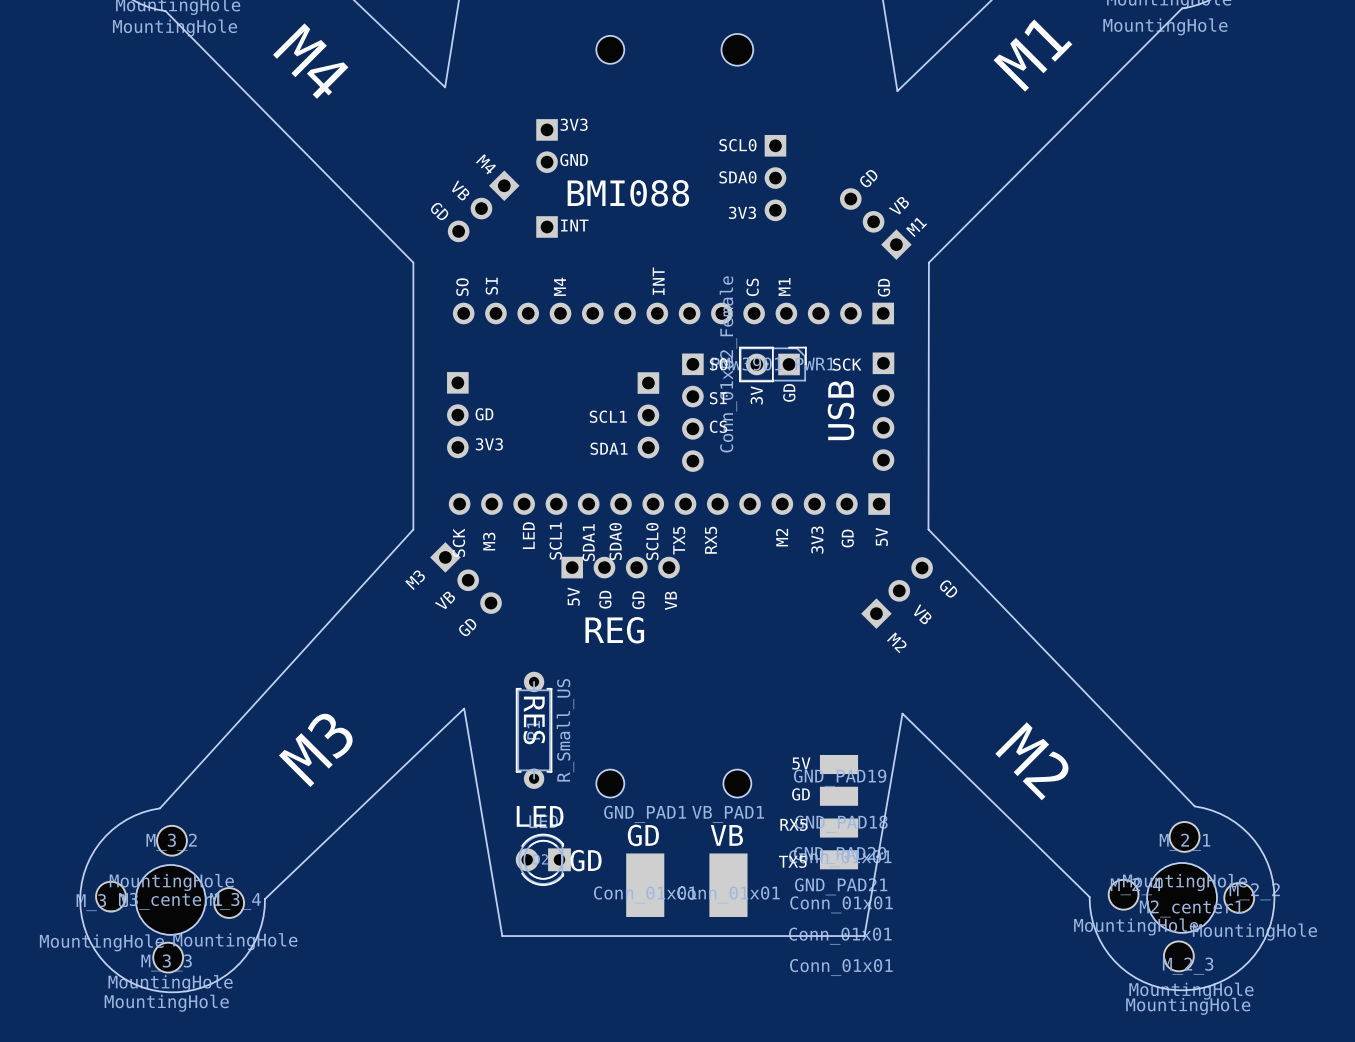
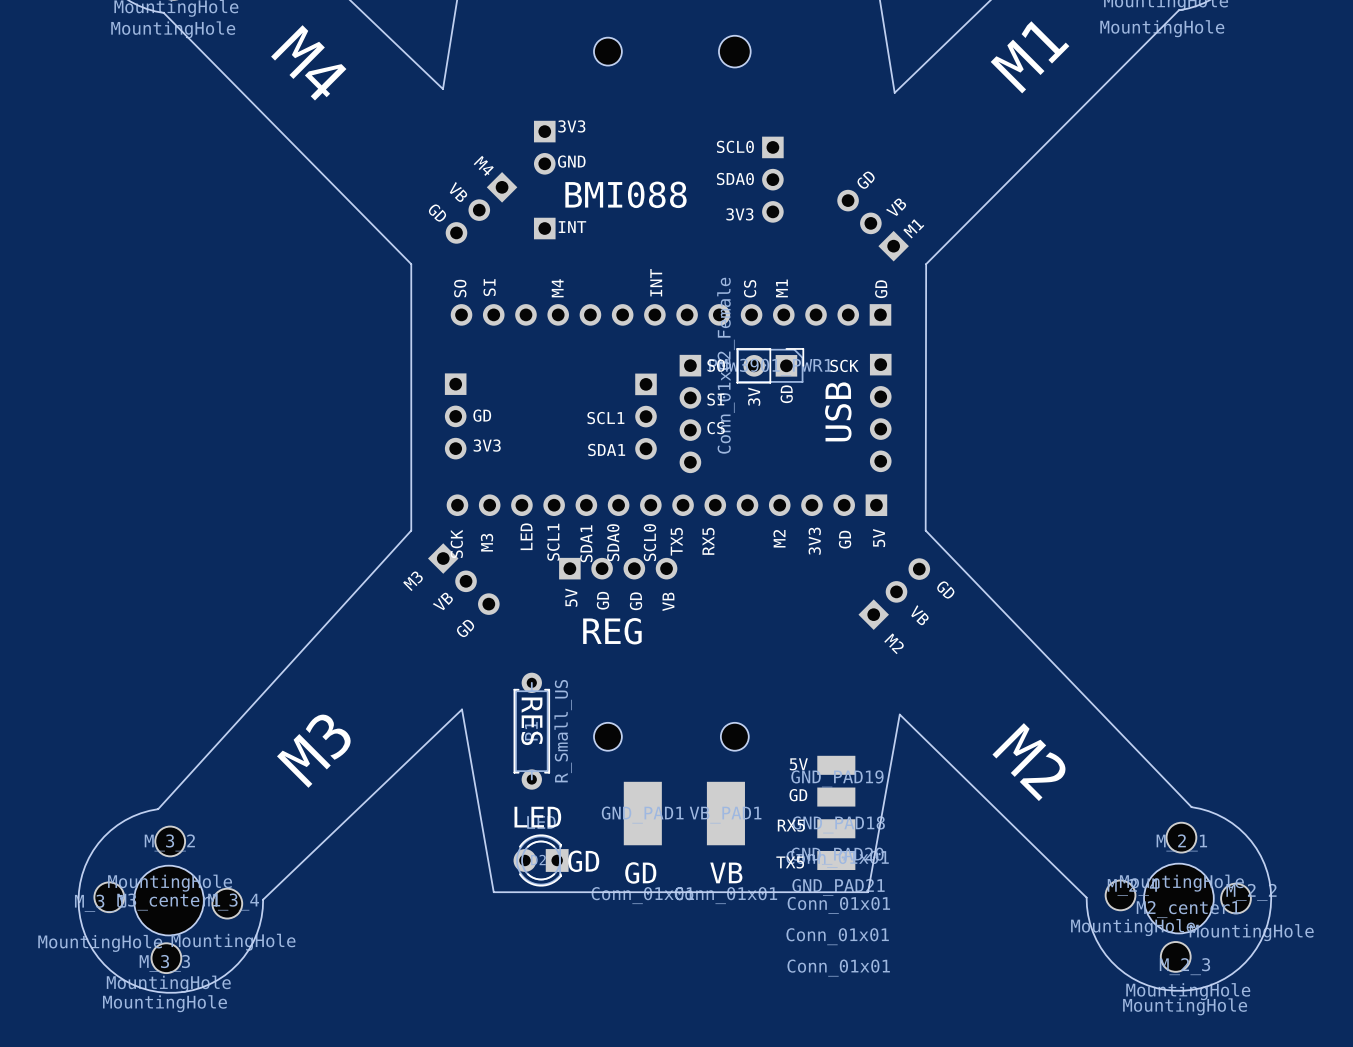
board edge: (464, 708) (502, 936) (864, 936) (902, 713) -> (462, 709) (493, 892) (868, 892) (899, 714)
part position: (610, 783) -> (607, 736)
part position: (737, 783) -> (734, 736)
text position: GD (643, 835) -> GD (640, 872)
text position: VB (726, 835) -> VB (726, 872)
GND_PAD1 position: (645, 885) -> (642, 813)
VB_PAD1 position: (728, 885) -> (725, 813)

